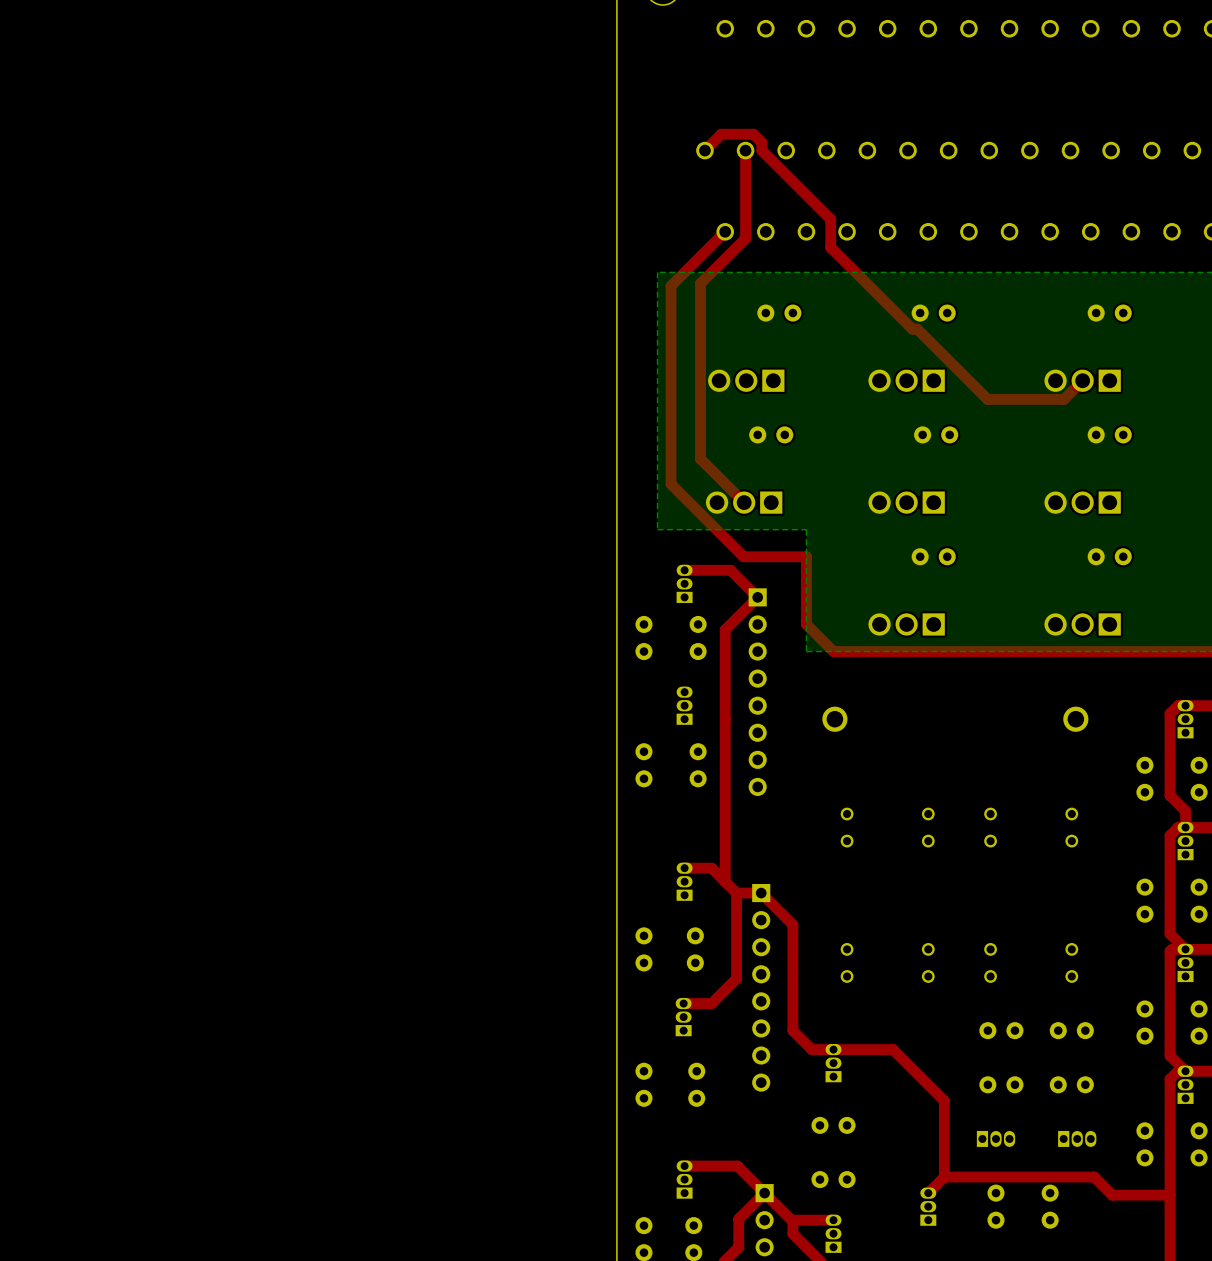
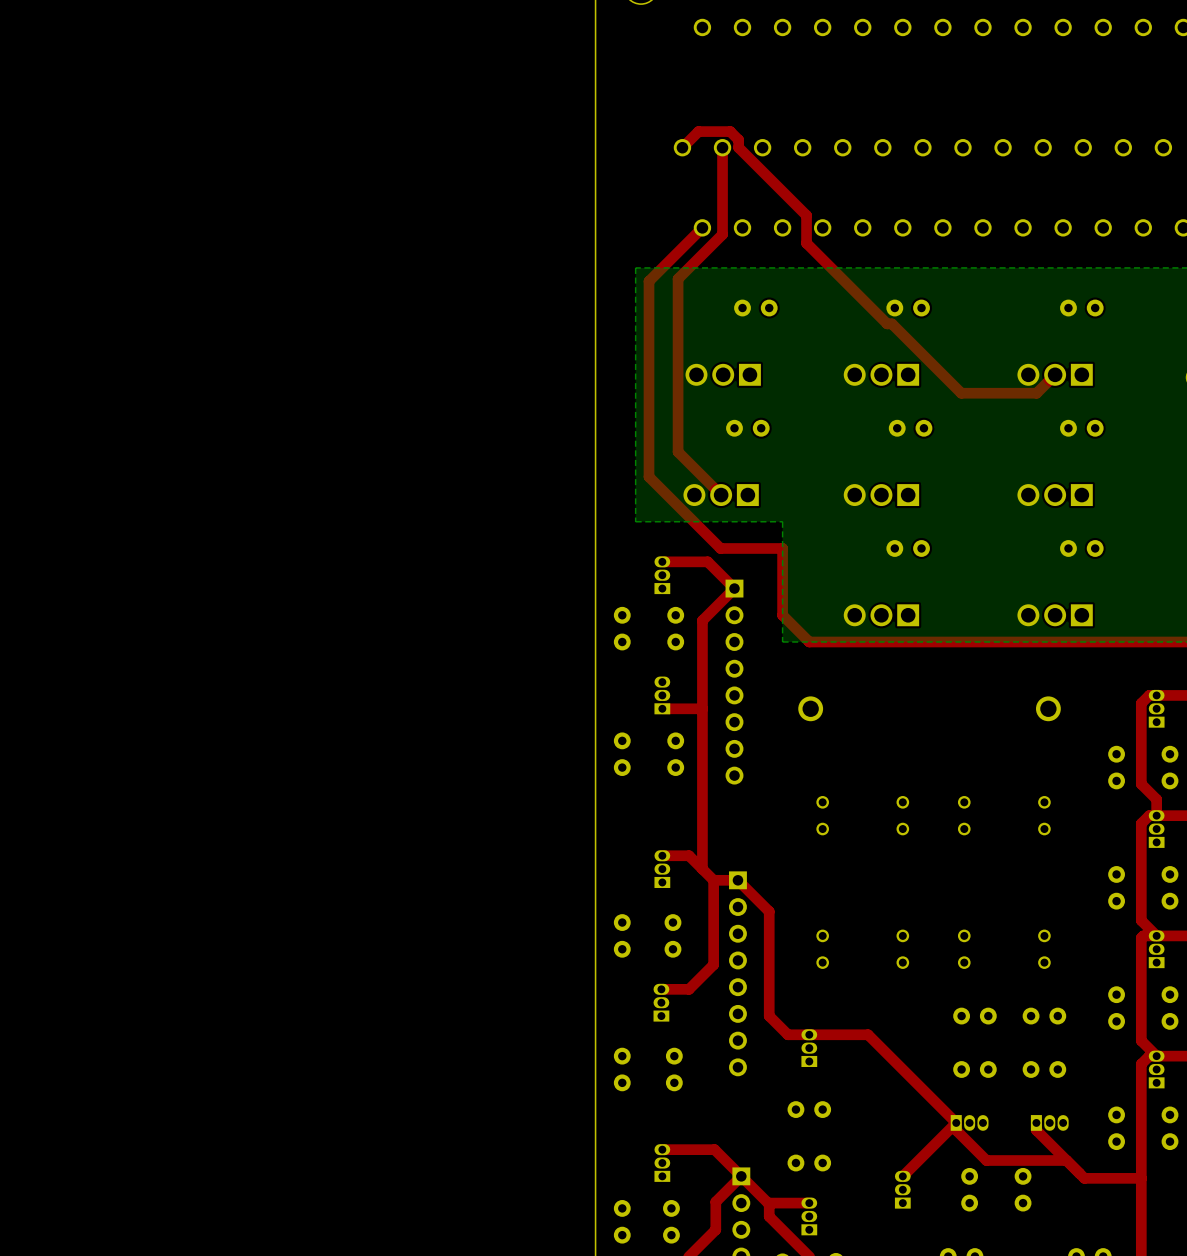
top track: none -> (702, 708) (662, 708)
top track: (944, 1100) (944, 1177) (1013, 1177) -> (918, 1085) (956, 1122)
top track: none -> (956, 1122) (956, 1130) (986, 1160)
top track: none -> (956, 1122) (918, 1160)
top track: none -> (1036, 1122) (1036, 1130) (1066, 1160)

